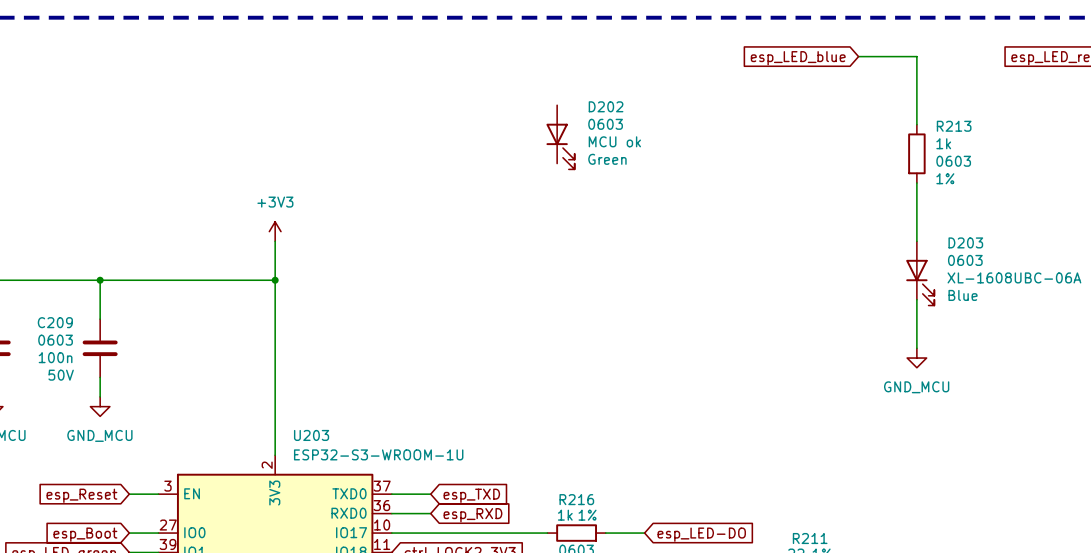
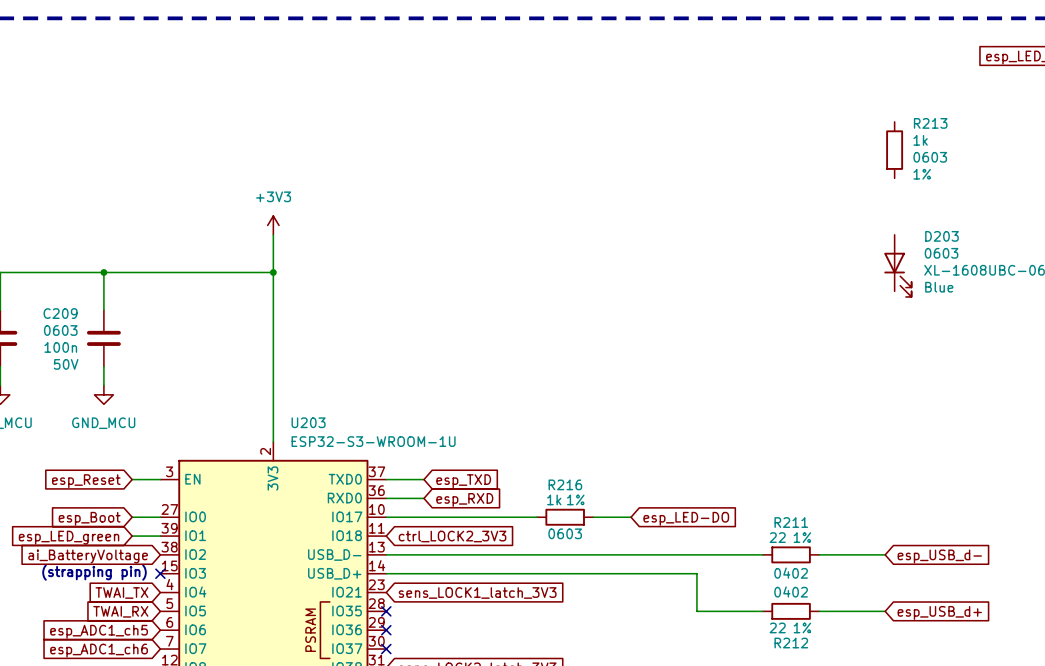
wire: (858, 56) (916, 56) (916, 124) -> none
global label: esp_LED_blue (798, 58) -> none
D202: MCU ok (560, 137) -> none
wire: (916, 183) (916, 241) -> none
wire: (916, 299) (916, 348) -> none
power symbol: GND_MCU (916, 358) -> none

